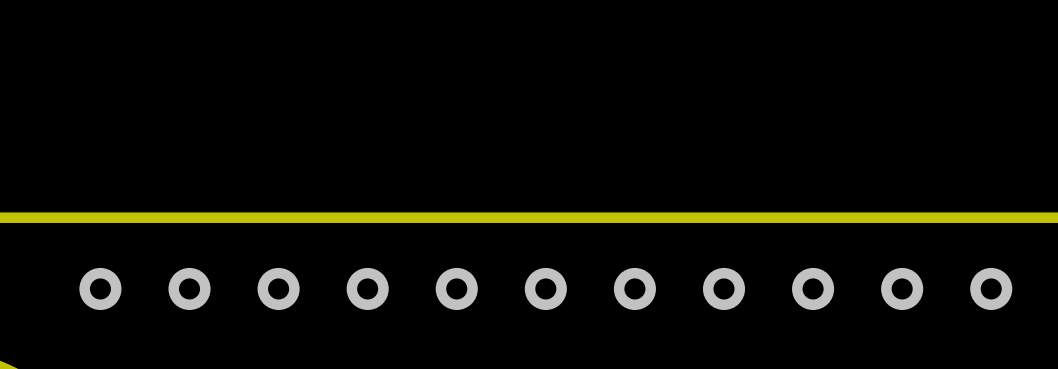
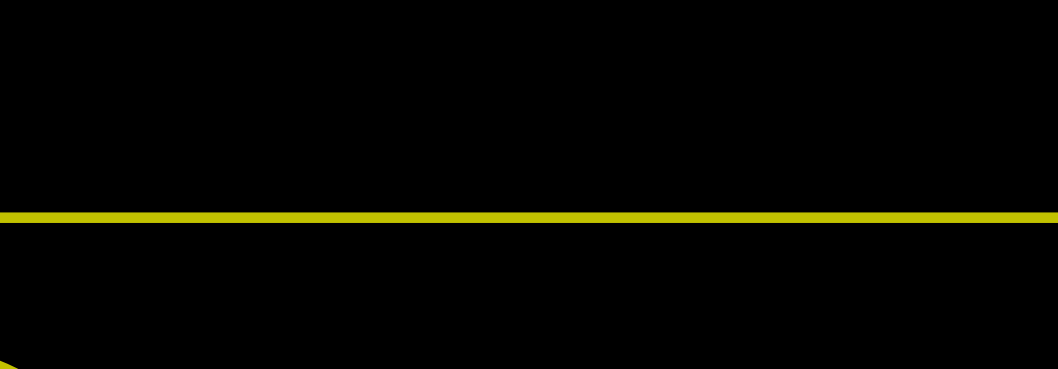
via: (100, 288) -> none
via: (189, 288) -> none
via: (278, 288) -> none
via: (367, 288) -> none
via: (456, 288) -> none
via: (545, 288) -> none
via: (634, 288) -> none
via: (724, 288) -> none
via: (813, 288) -> none
via: (902, 288) -> none
via: (991, 288) -> none

